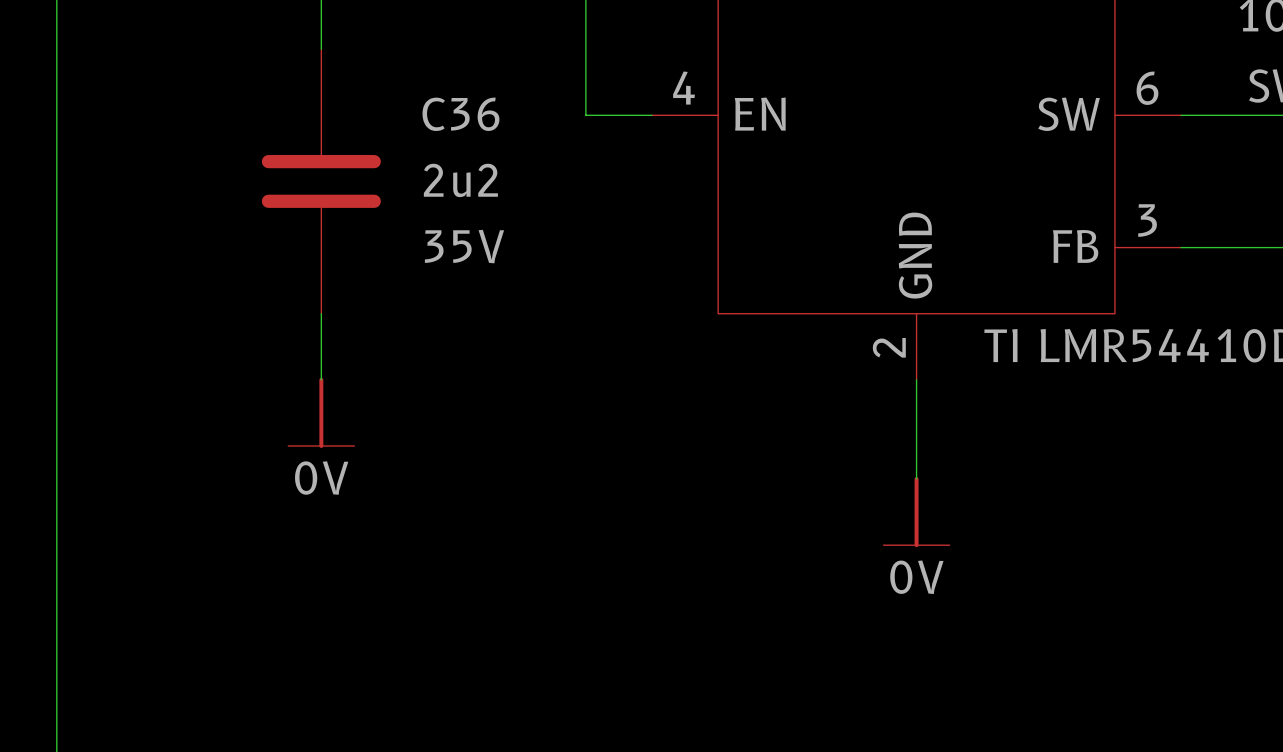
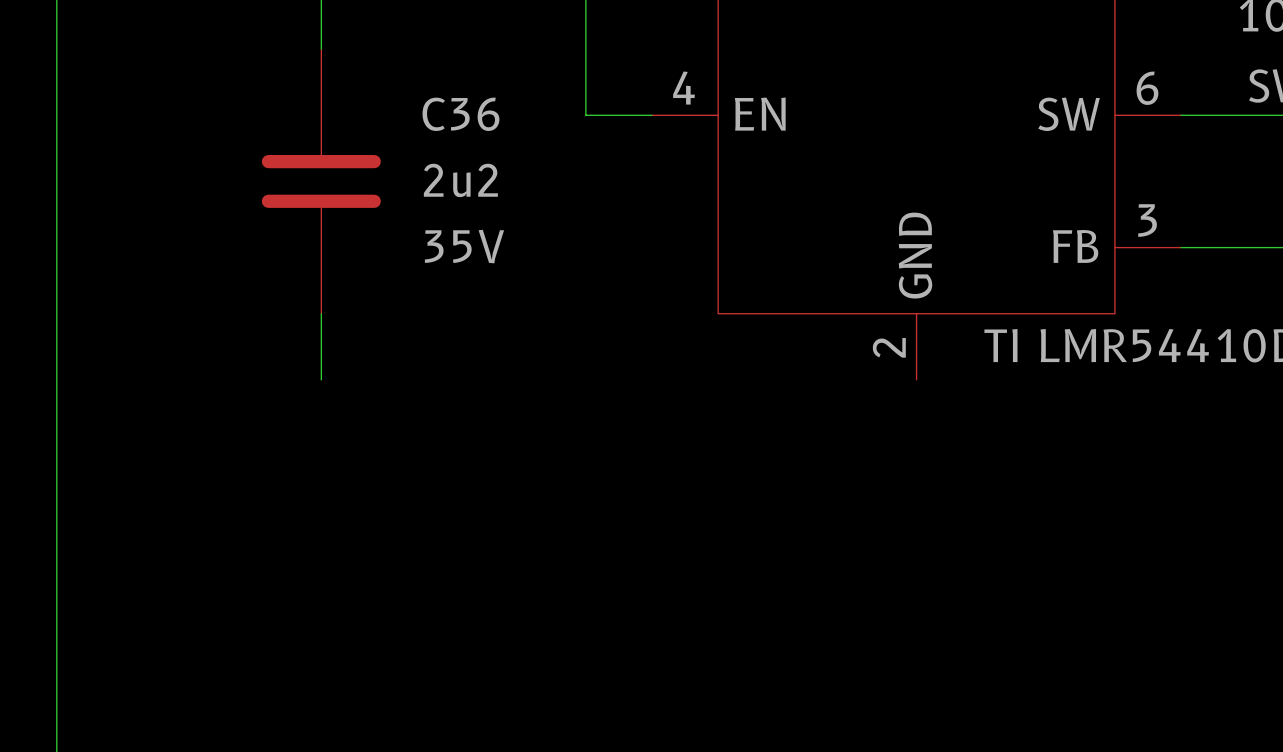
wire: (916, 379) (916, 479) -> none
power symbol: 0V (321, 412) -> none
power symbol: 0V (916, 512) -> none

